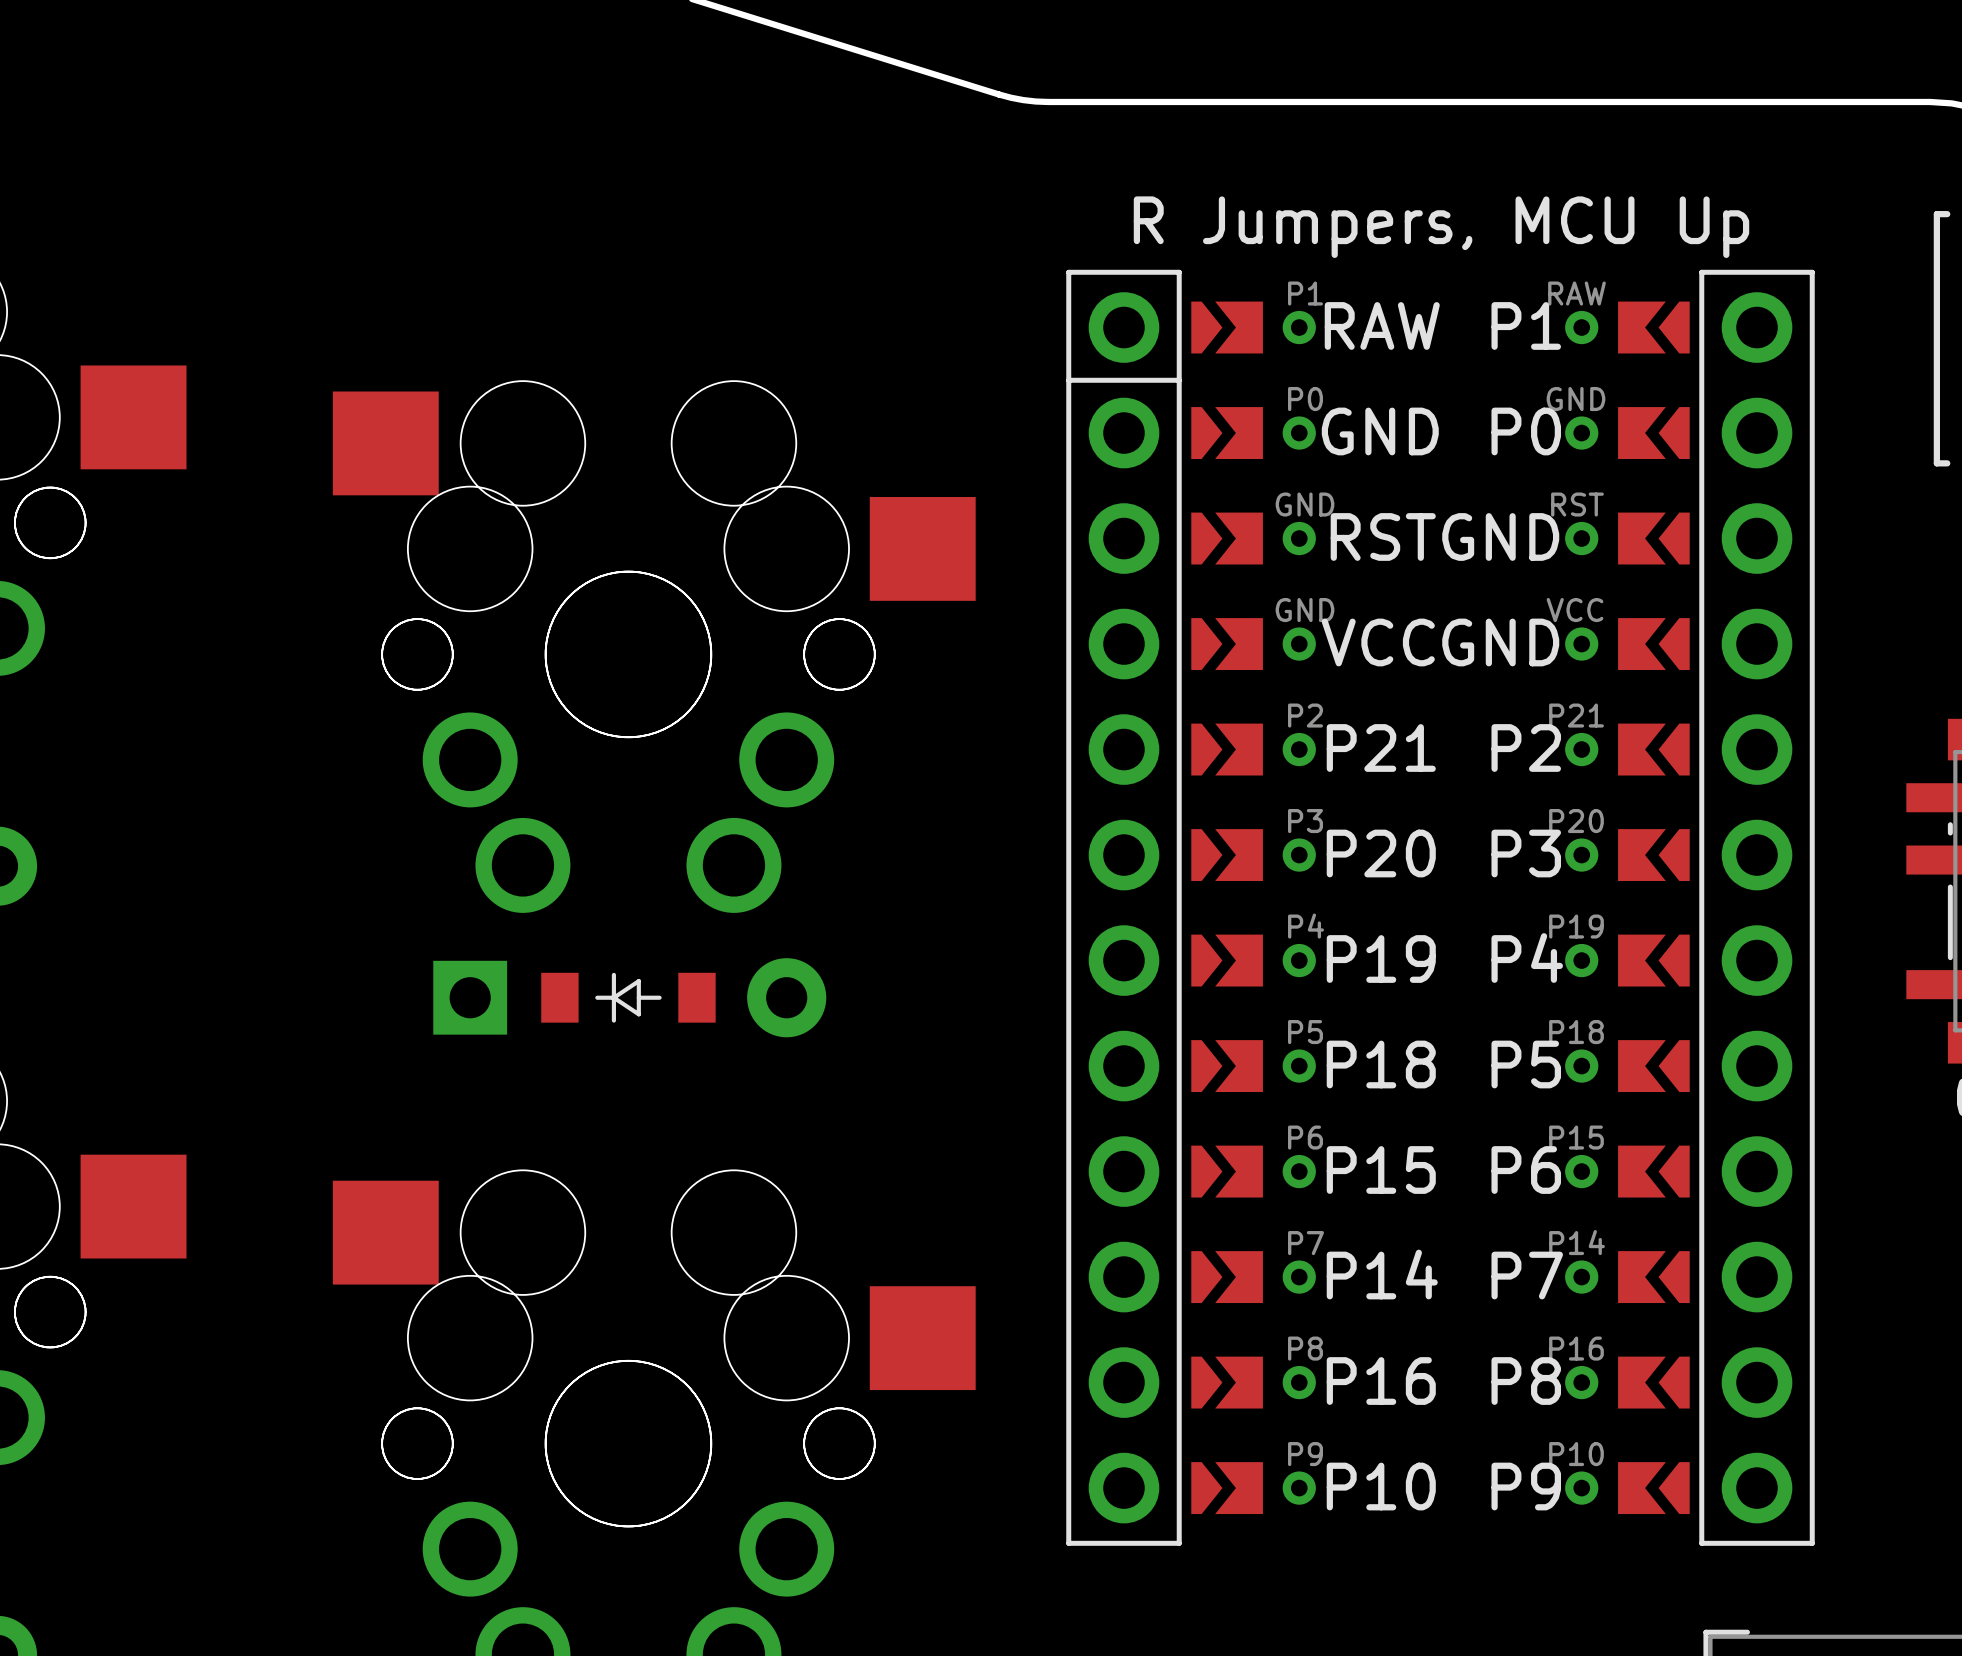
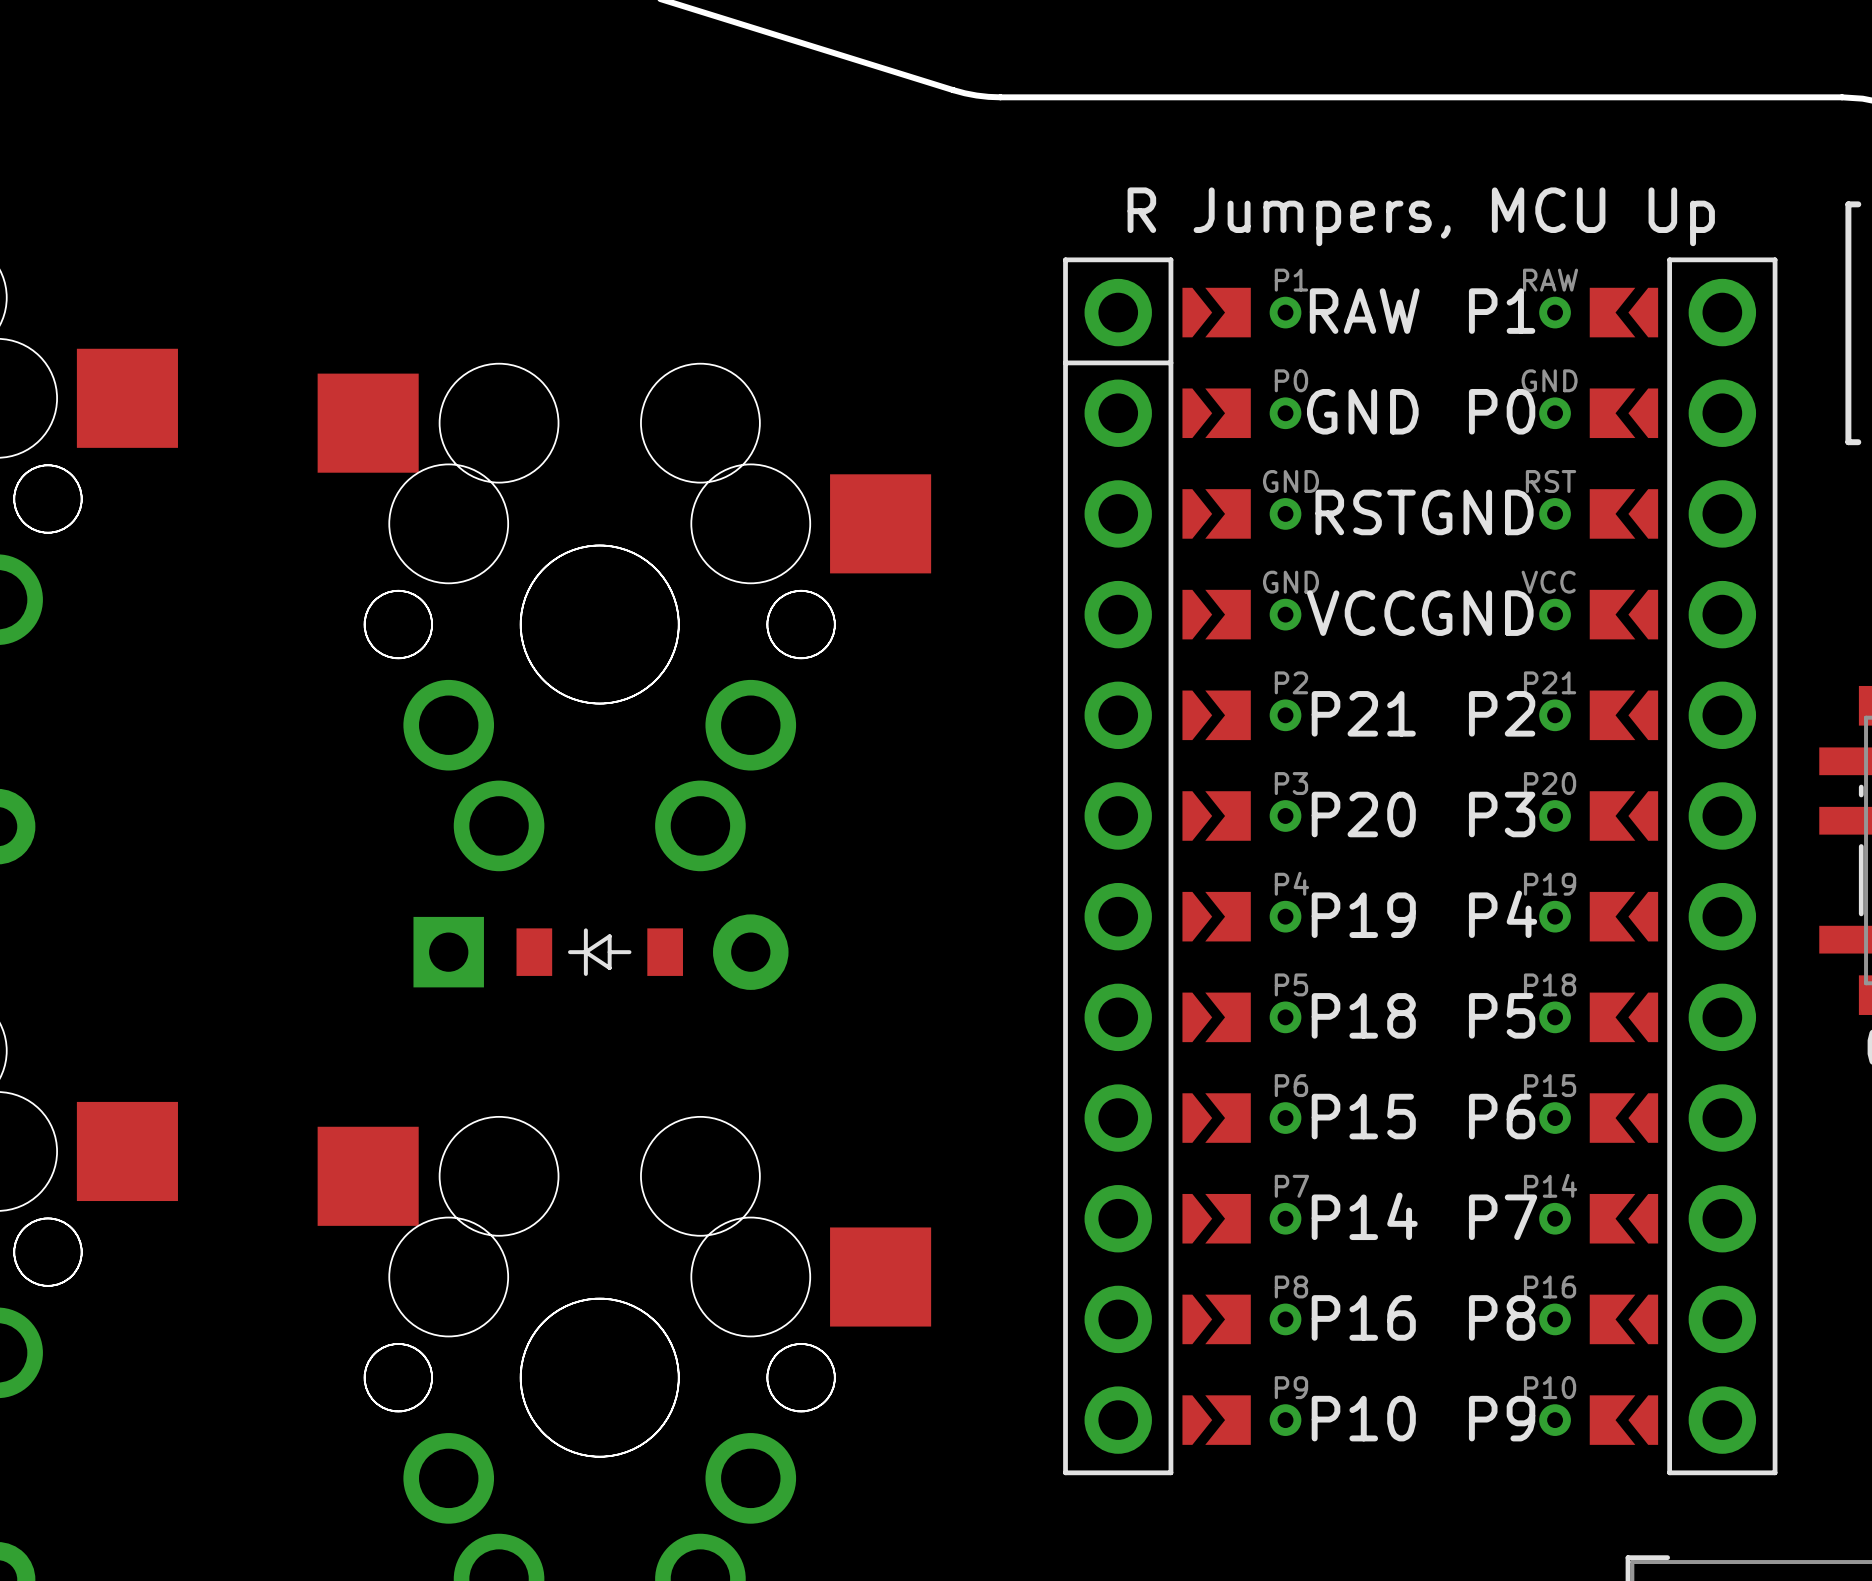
part position: (1440, 907) -> (1420, 866)

